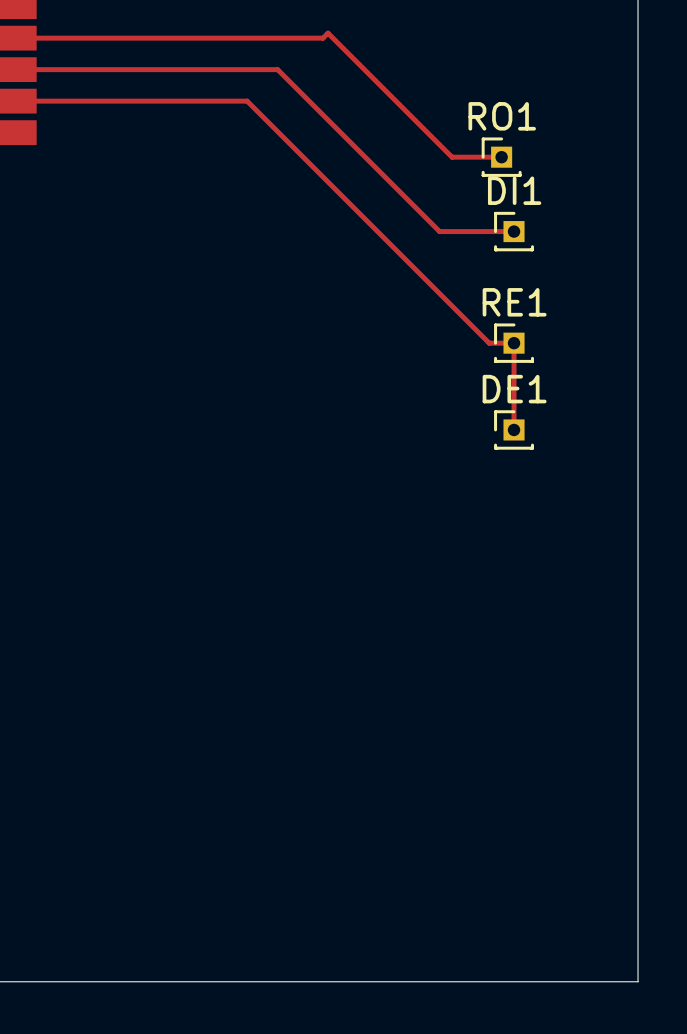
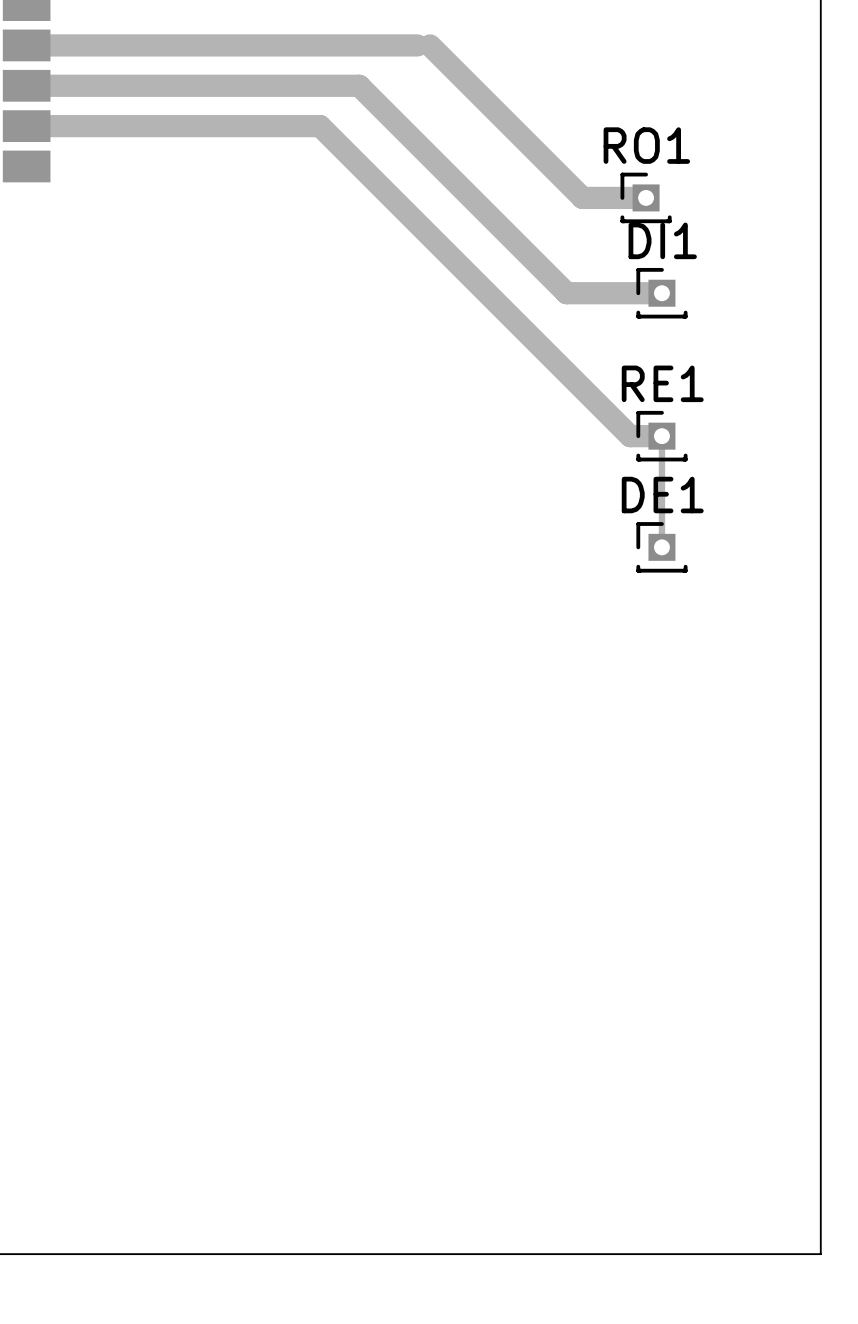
track width: thin (18, 38) (323, 38) -> thick (26, 45) (417, 45)
track width: thin (333, 38) (452, 157) (501, 157) -> thick (430, 45) (582, 197) (646, 197)
track width: thin (18, 69) (277, 69) (439, 231) (514, 231) -> thick (26, 85) (359, 85) (566, 293) (661, 293)
track width: thin (18, 101) (247, 101) (489, 343) (514, 343) -> thick (26, 126) (320, 126) (630, 436) (661, 436)

